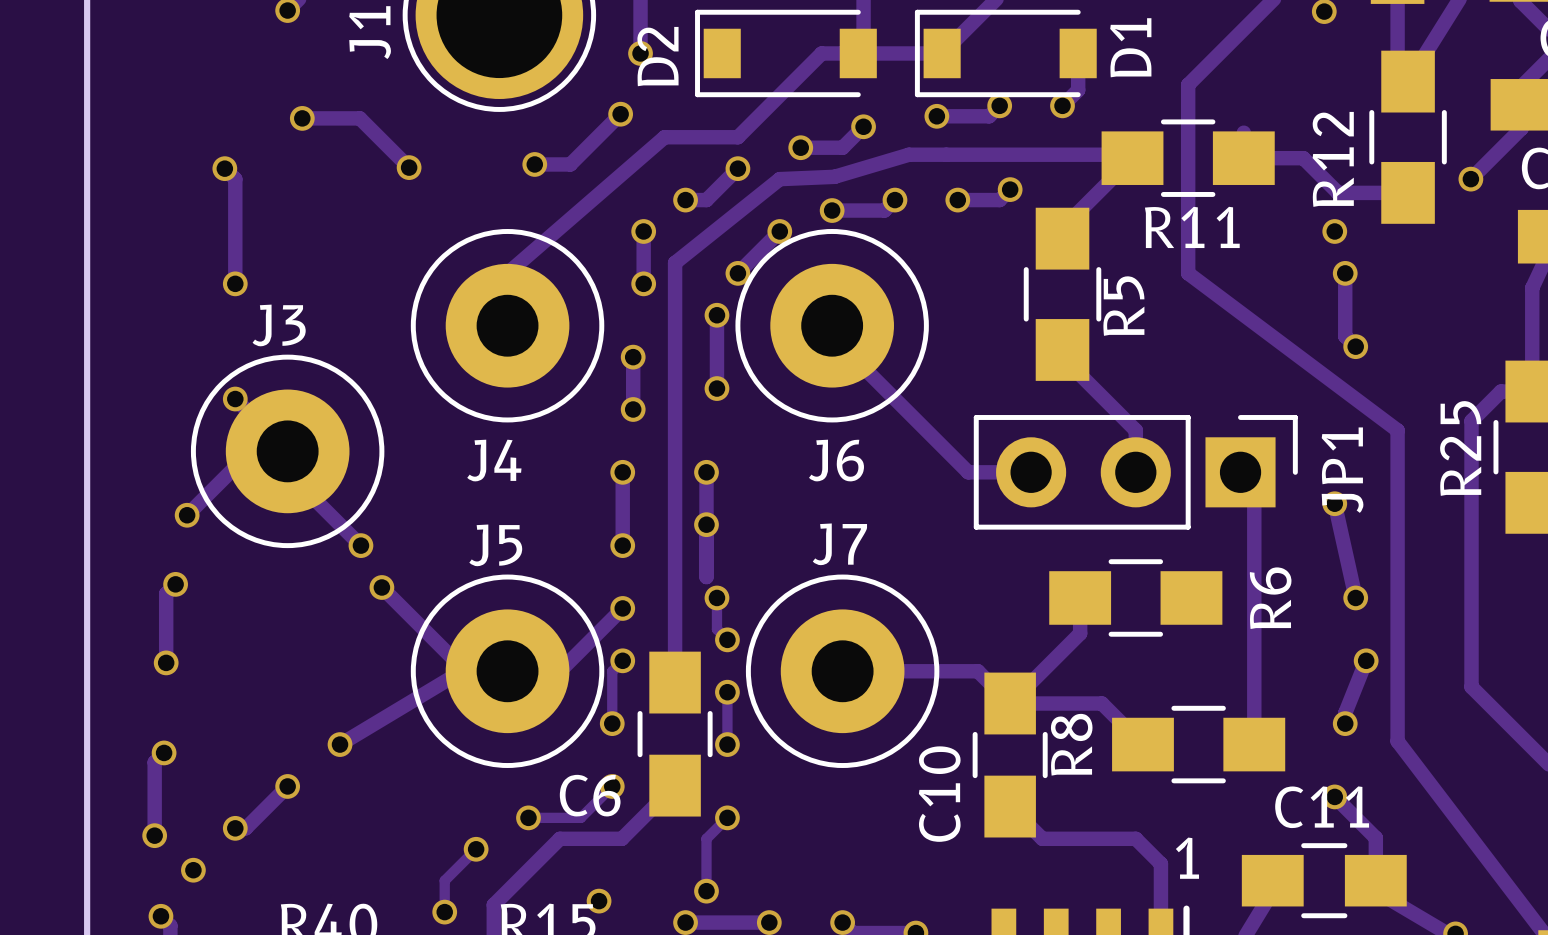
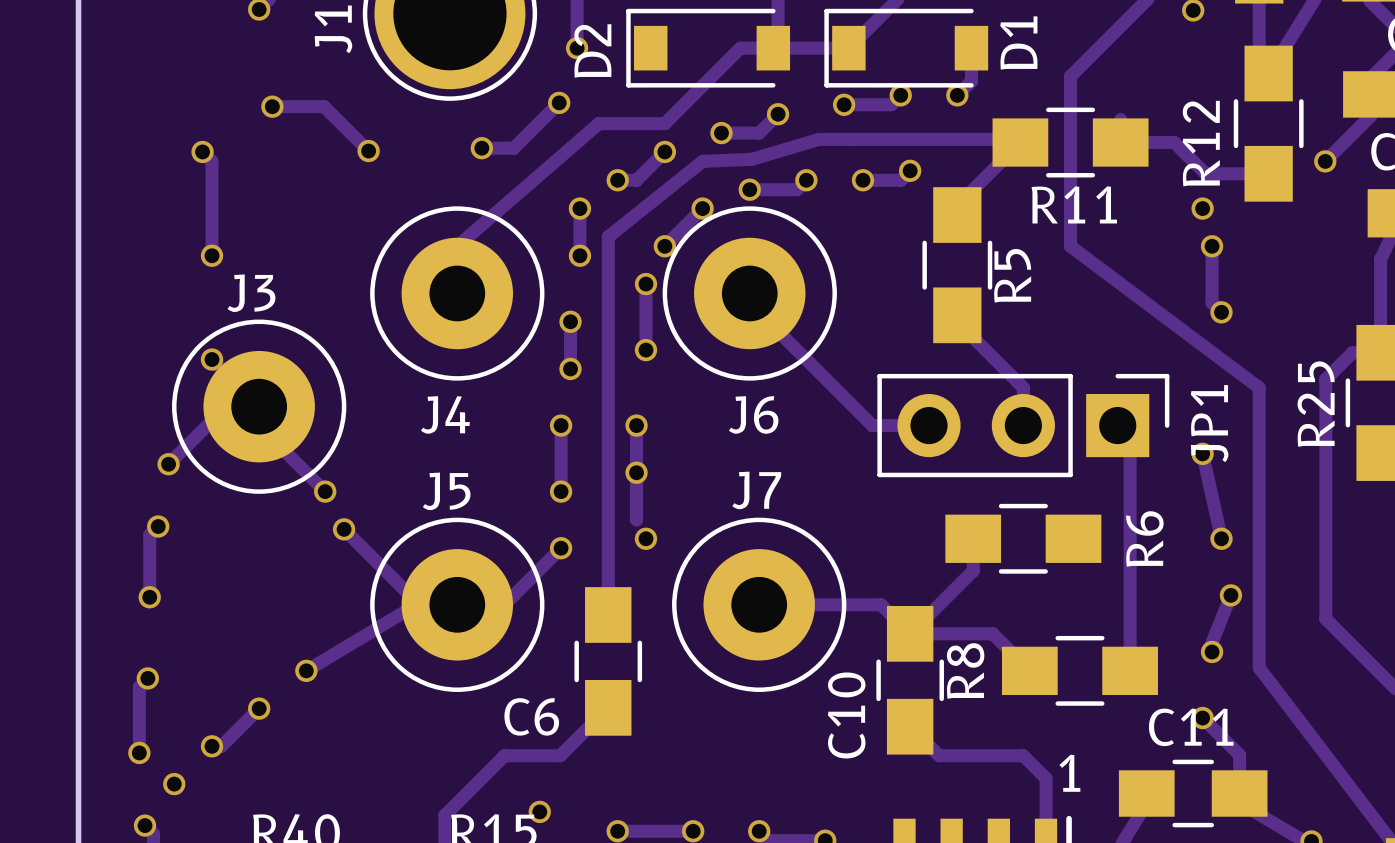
track: (716, 597) (716, 629) (727, 639) -> none
via: (727, 639) -> none
track: (622, 660) (612, 671) (612, 723) -> none
via: (622, 660) -> none
track: (727, 692) (727, 744) -> none
via: (727, 692) -> none
via: (612, 723) -> none
via: (727, 744) -> none
track: (612, 786) (580, 817) (528, 817) -> none
via: (612, 786) -> none
via: (528, 817) -> none
track: (727, 817) (706, 838) (706, 891) -> none
via: (727, 817) -> none
track: (476, 849) (444, 880) (444, 912) -> none
via: (476, 849) -> none
via: (706, 891) -> none
via: (444, 912) -> none

